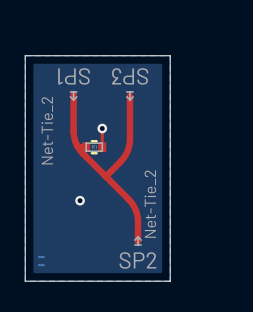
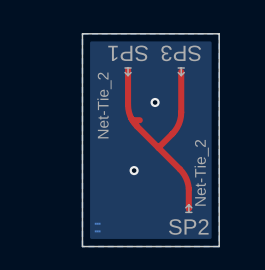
top track: (102, 128) (102, 147) -> none
part: (94, 147) -> none

